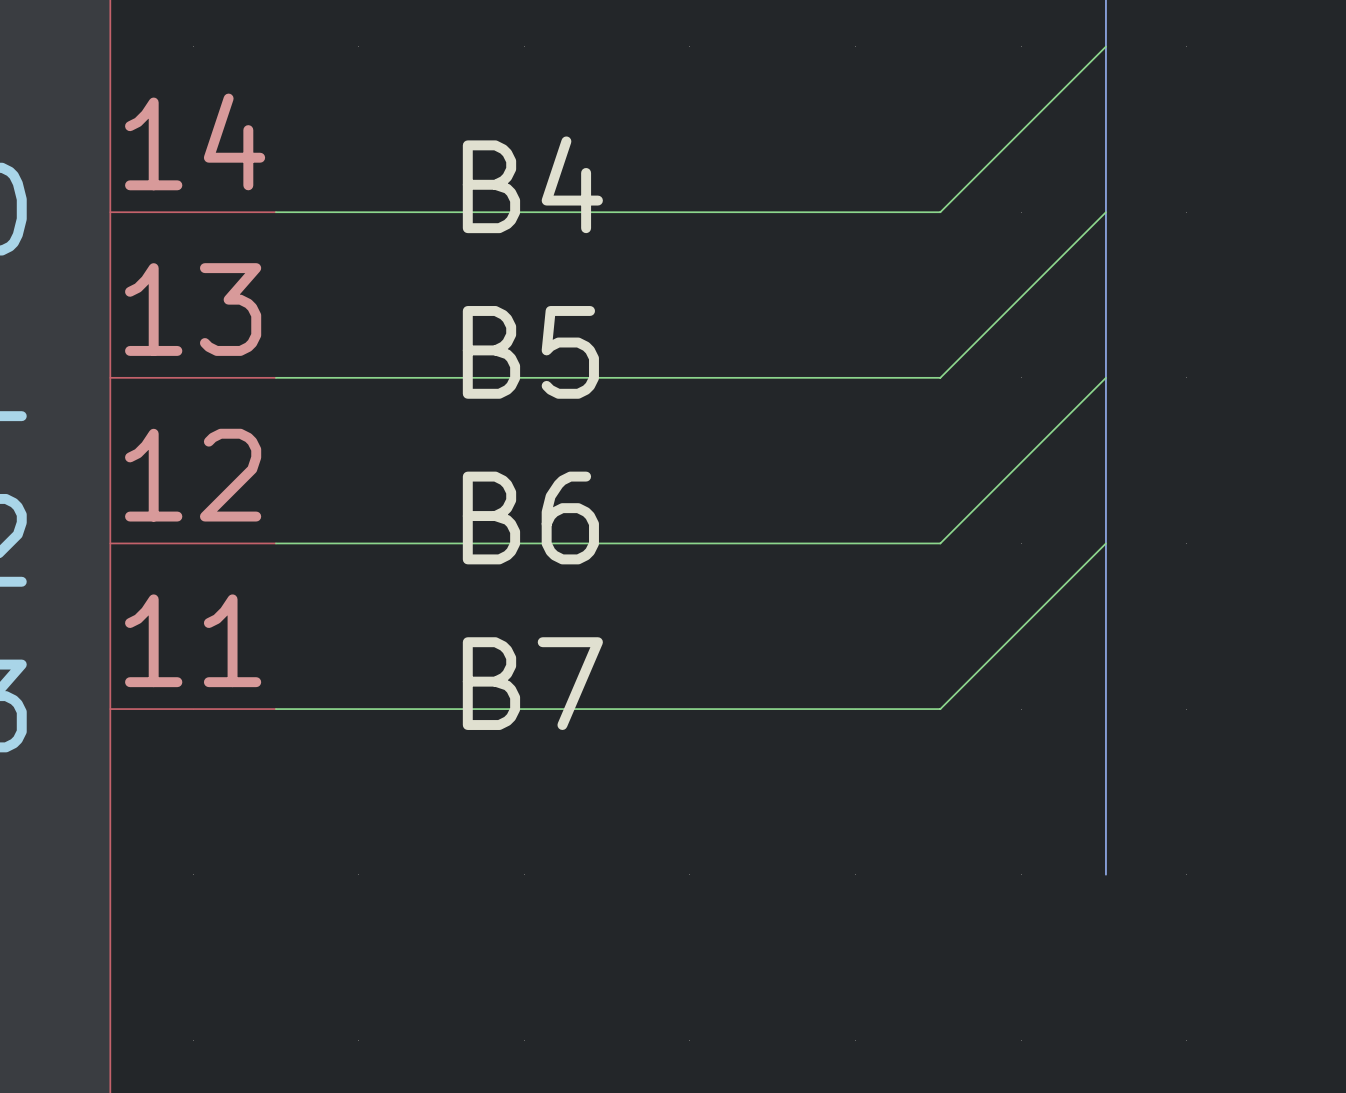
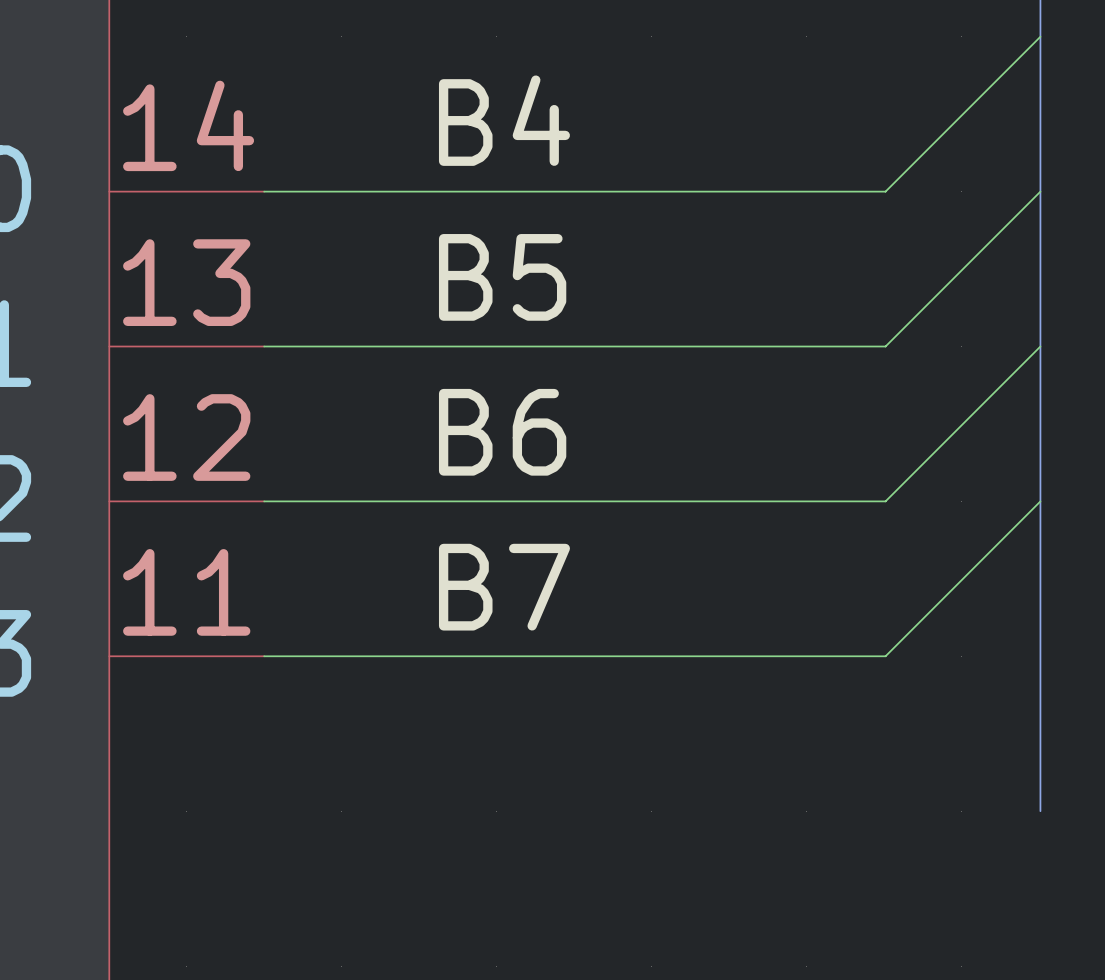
label position: B4 (532, 184) -> B4 (504, 120)
label position: B5 (530, 352) -> B5 (502, 277)
label position: B6 (530, 517) -> B6 (502, 432)
label position: B7 (532, 683) -> B7 (504, 587)

